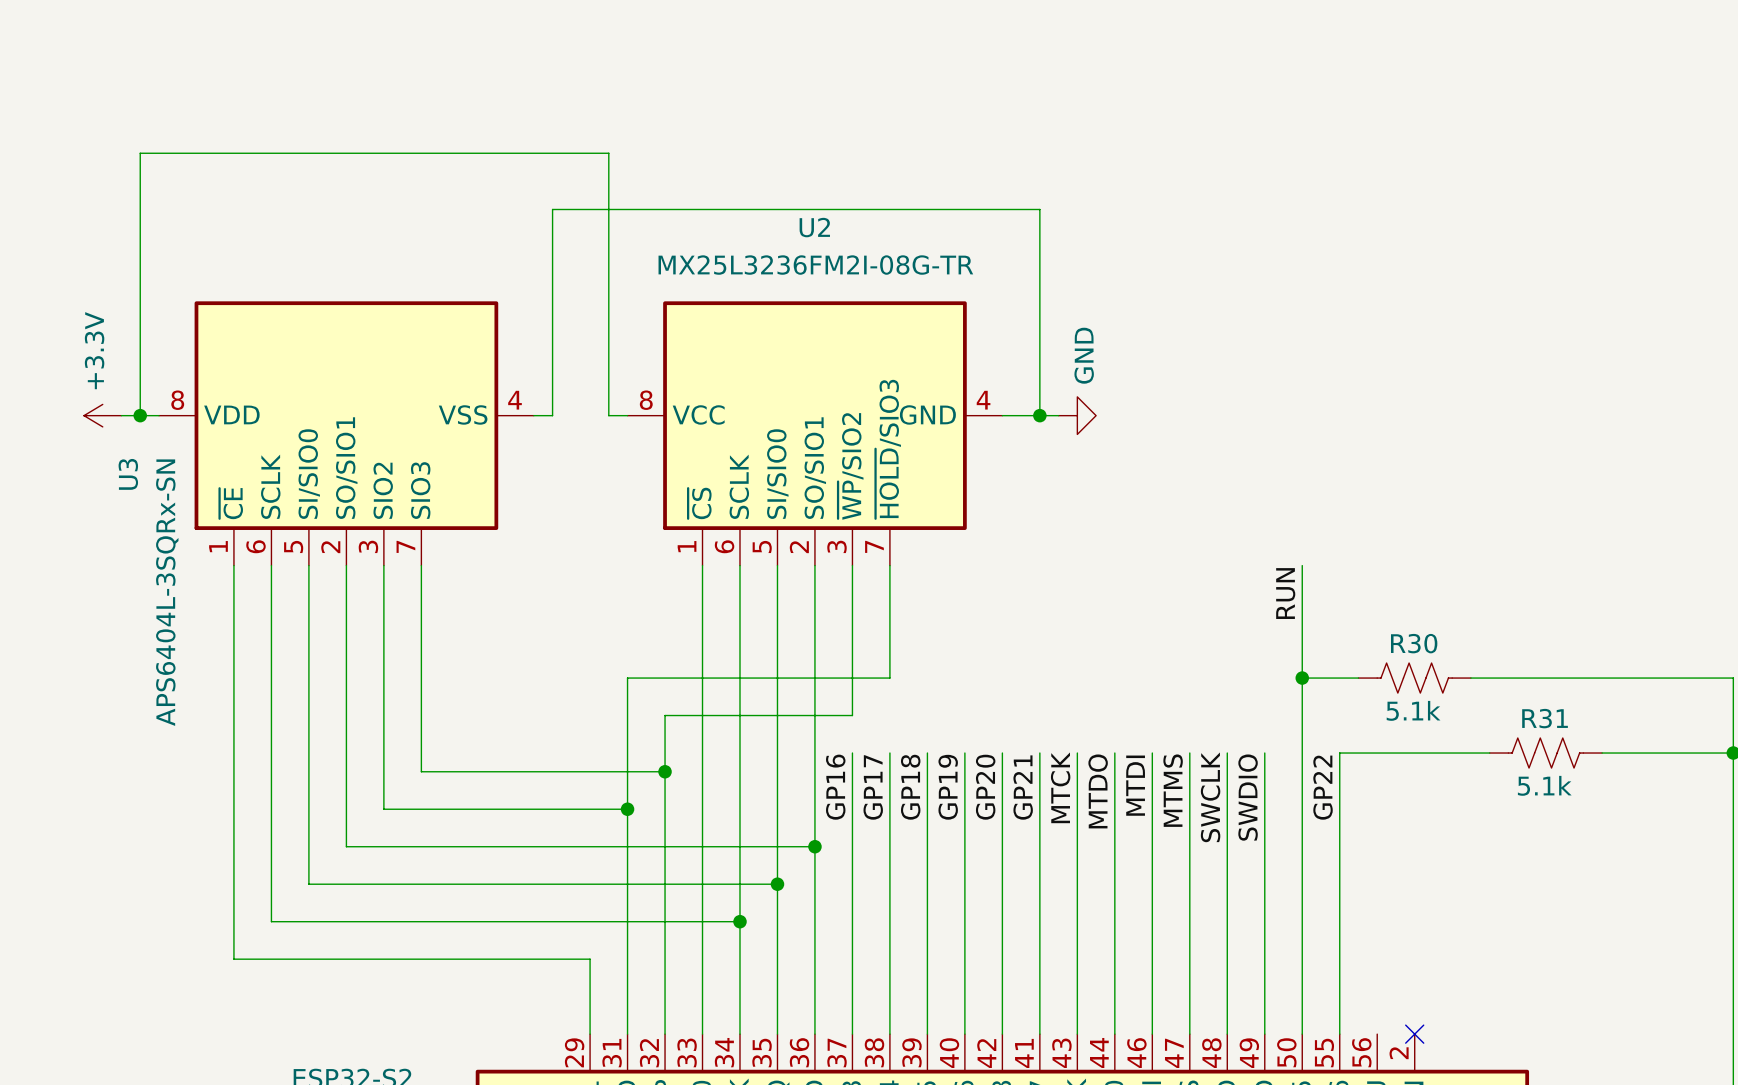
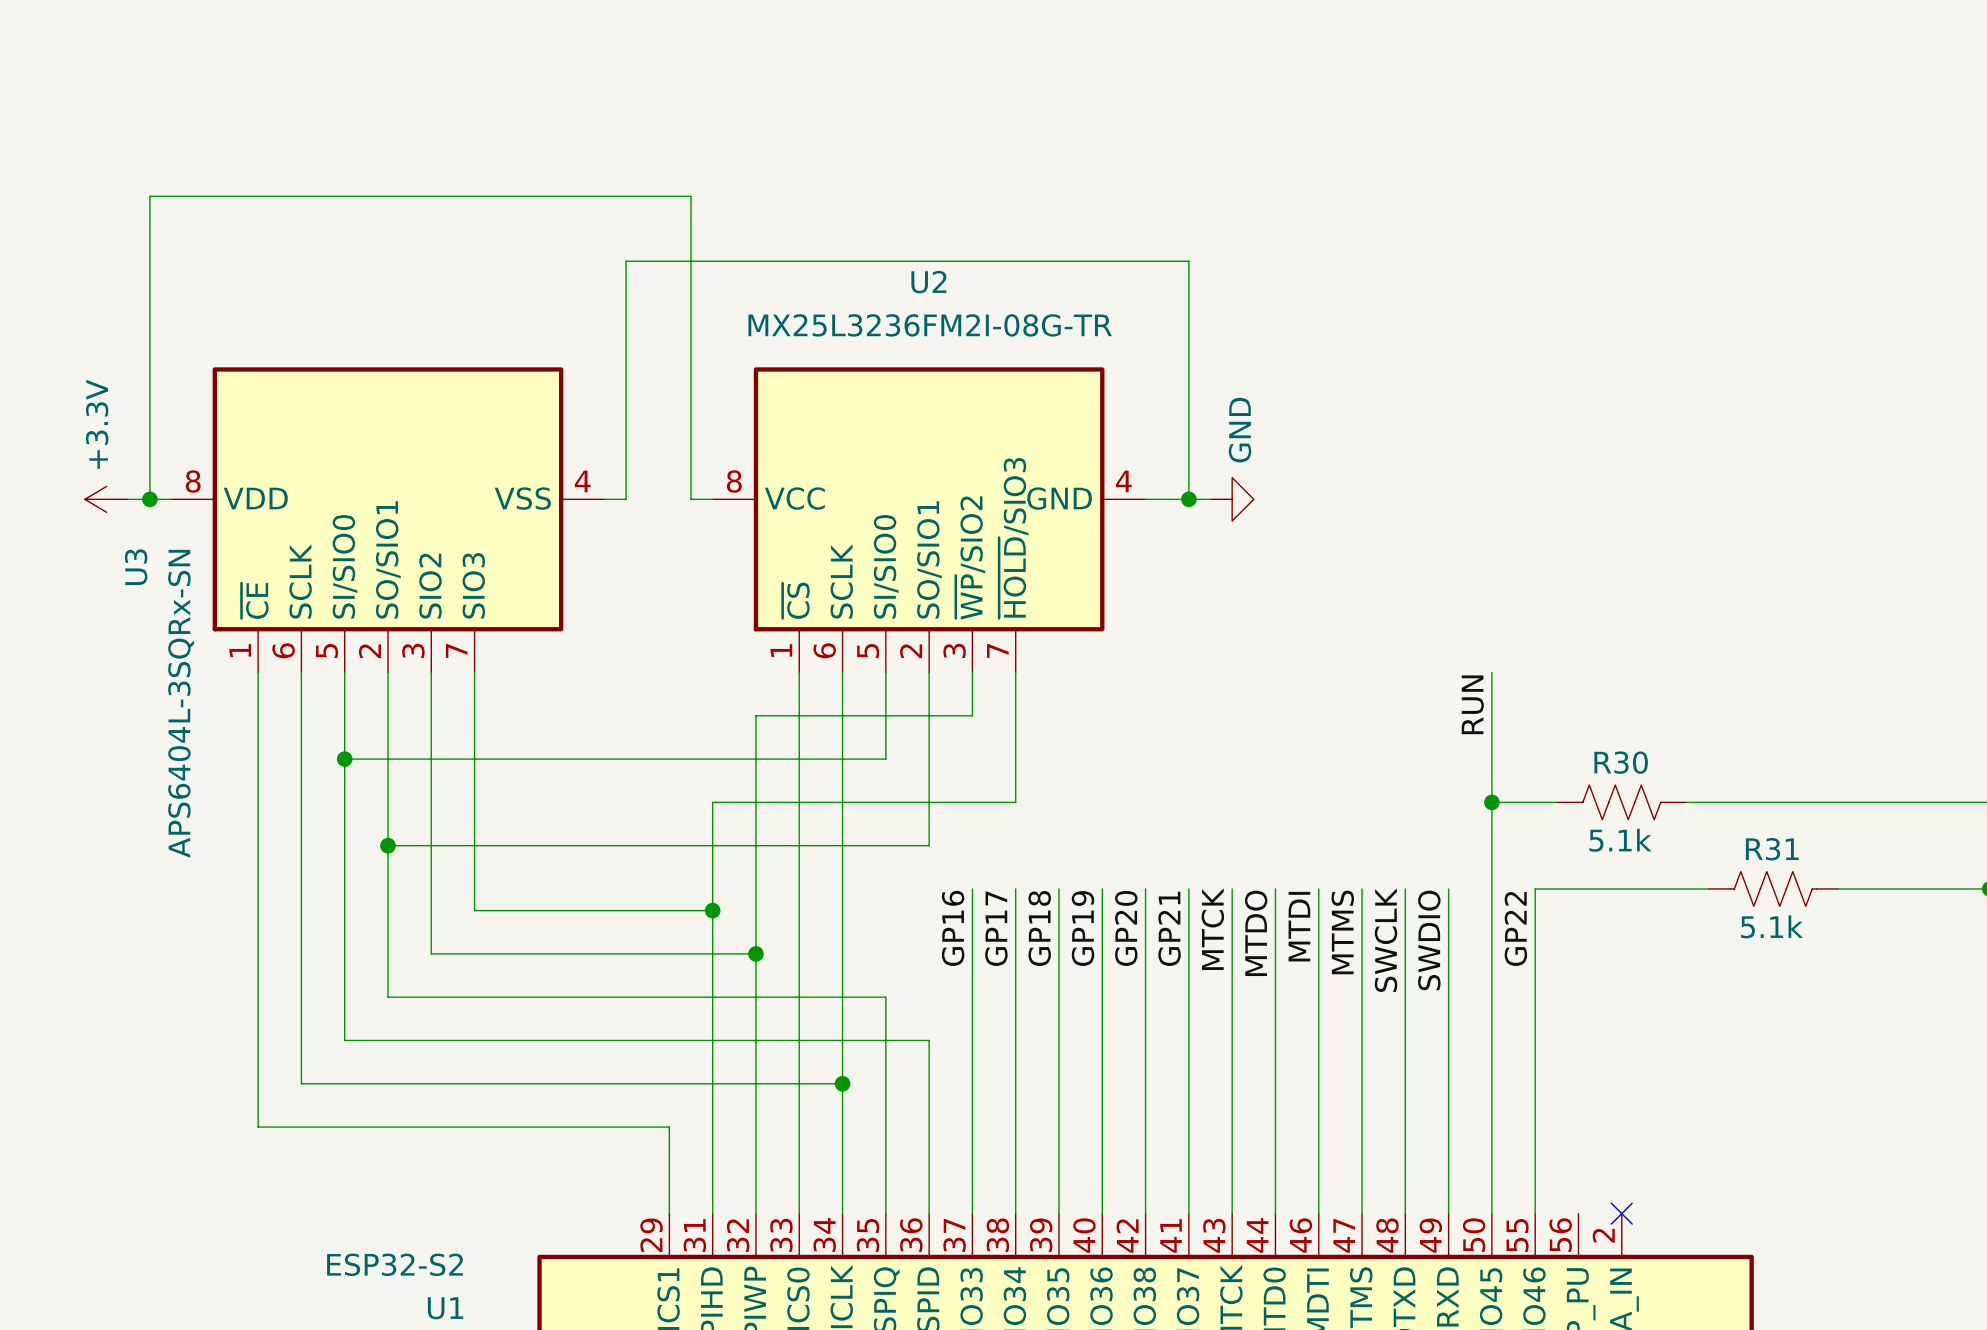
wire: (852, 603) (852, 715) (814, 715) (814, 884) -> (885, 1040) (929, 1040)
wire: none -> (972, 715) (755, 715) (755, 845) (387, 845)
junction: none -> (344, 759)
wire: (777, 640) (777, 846) (814, 846) -> (885, 759) (344, 759)
junction: none -> (387, 845)
wire: (627, 771) (665, 771) -> (712, 953) (755, 953)
junction: none -> (712, 910)
junction: (665, 771) -> none
junction: (627, 809) -> none
junction: none -> (755, 953)
junction: (814, 846) -> none
junction: (777, 884) -> none

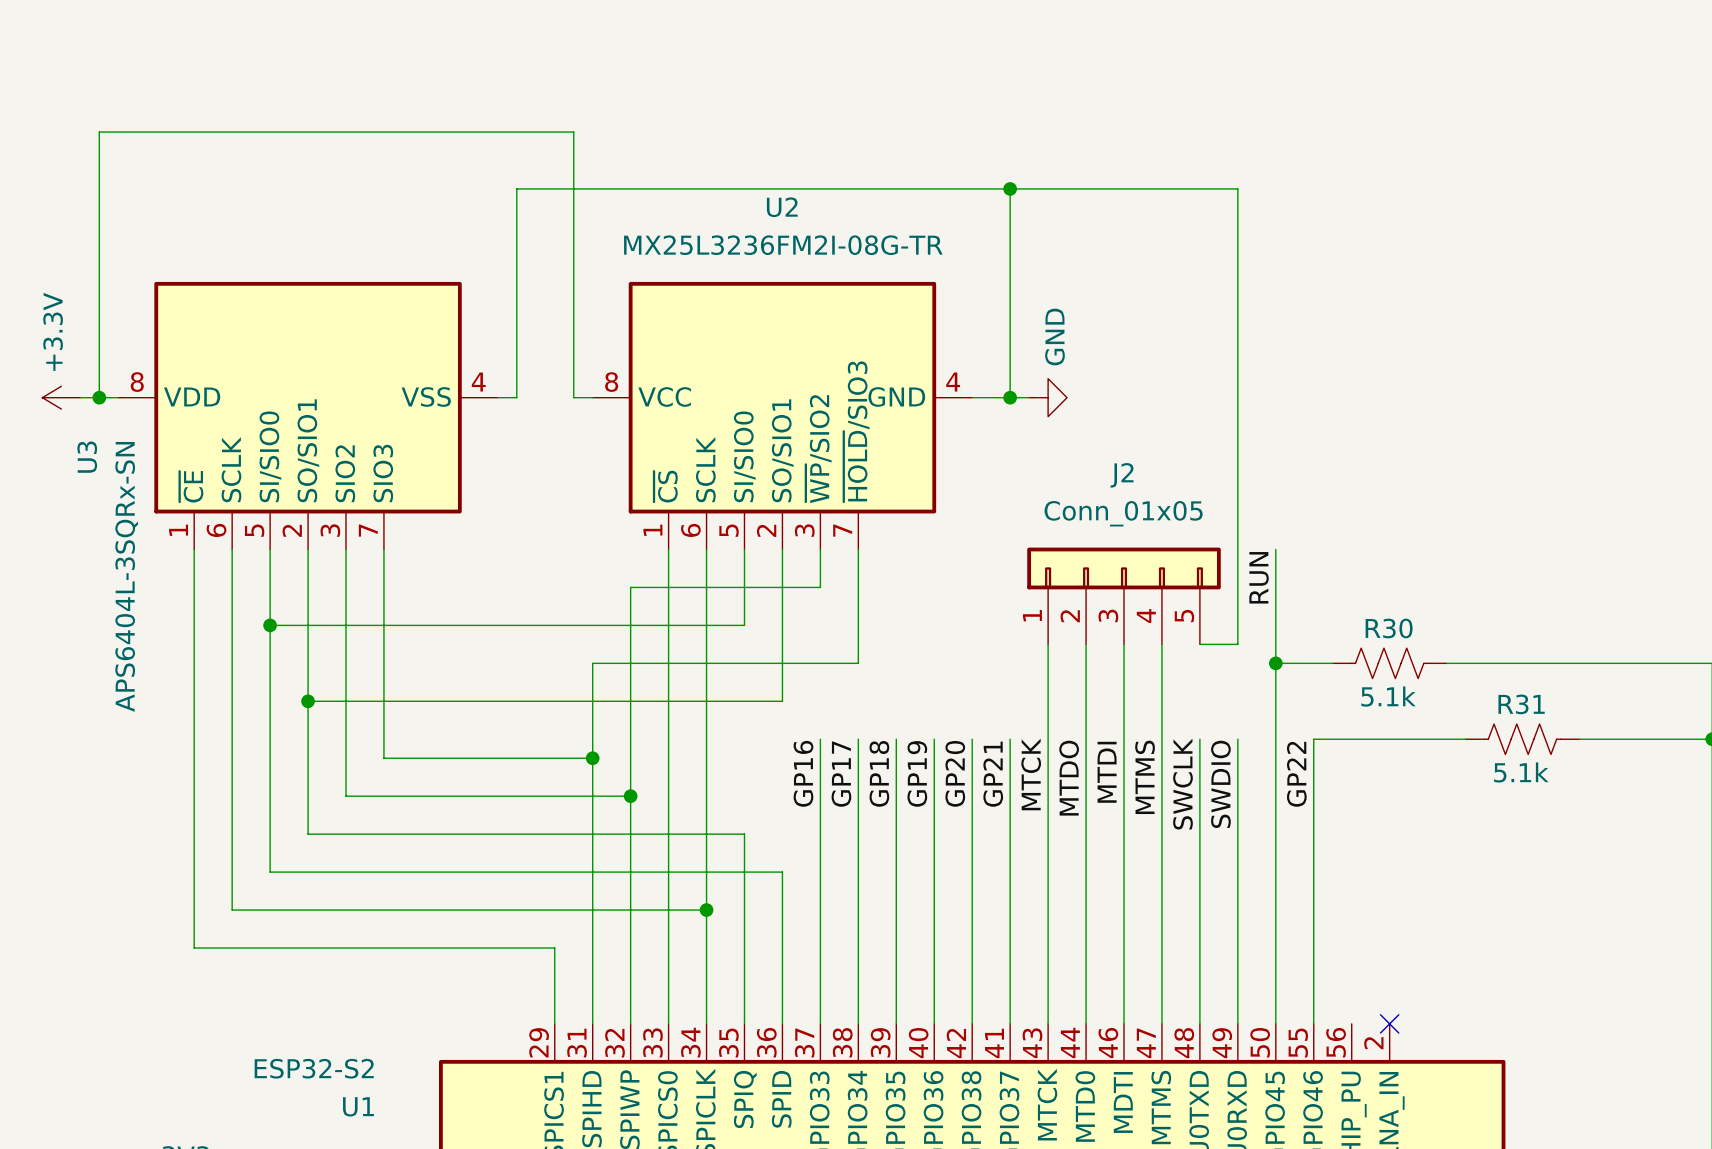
wire: none -> (1010, 188) (1237, 188) (1237, 644) (1199, 644)
junction: none -> (1010, 188)
J2: none -> Conn_01x05 (1124, 595)
wire: none -> (1048, 644) (1048, 739)
wire: none -> (1086, 644) (1086, 739)
wire: none -> (1124, 644) (1124, 739)
wire: none -> (1161, 644) (1161, 739)

